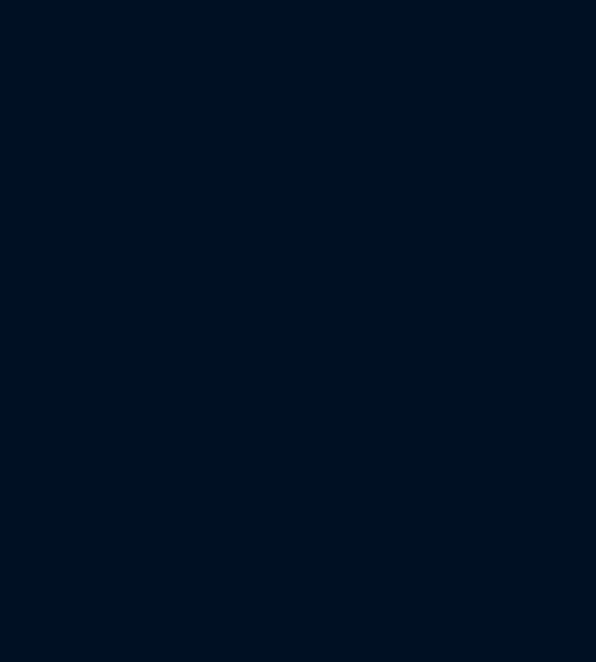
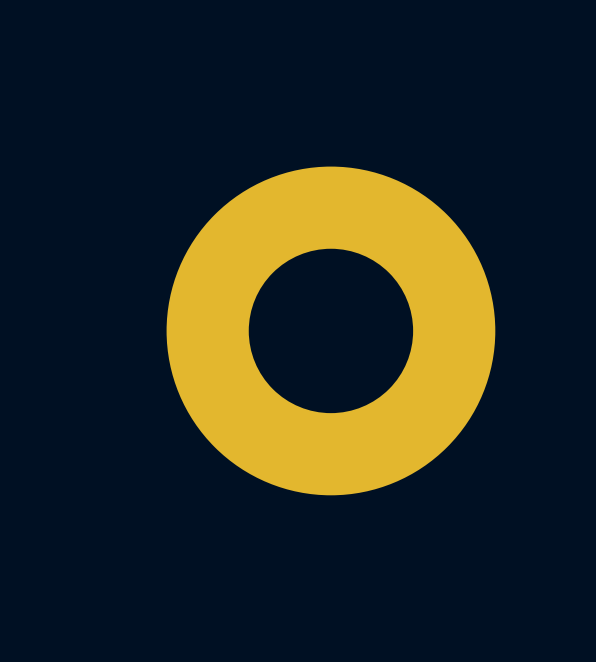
part: none -> (330, 330)

